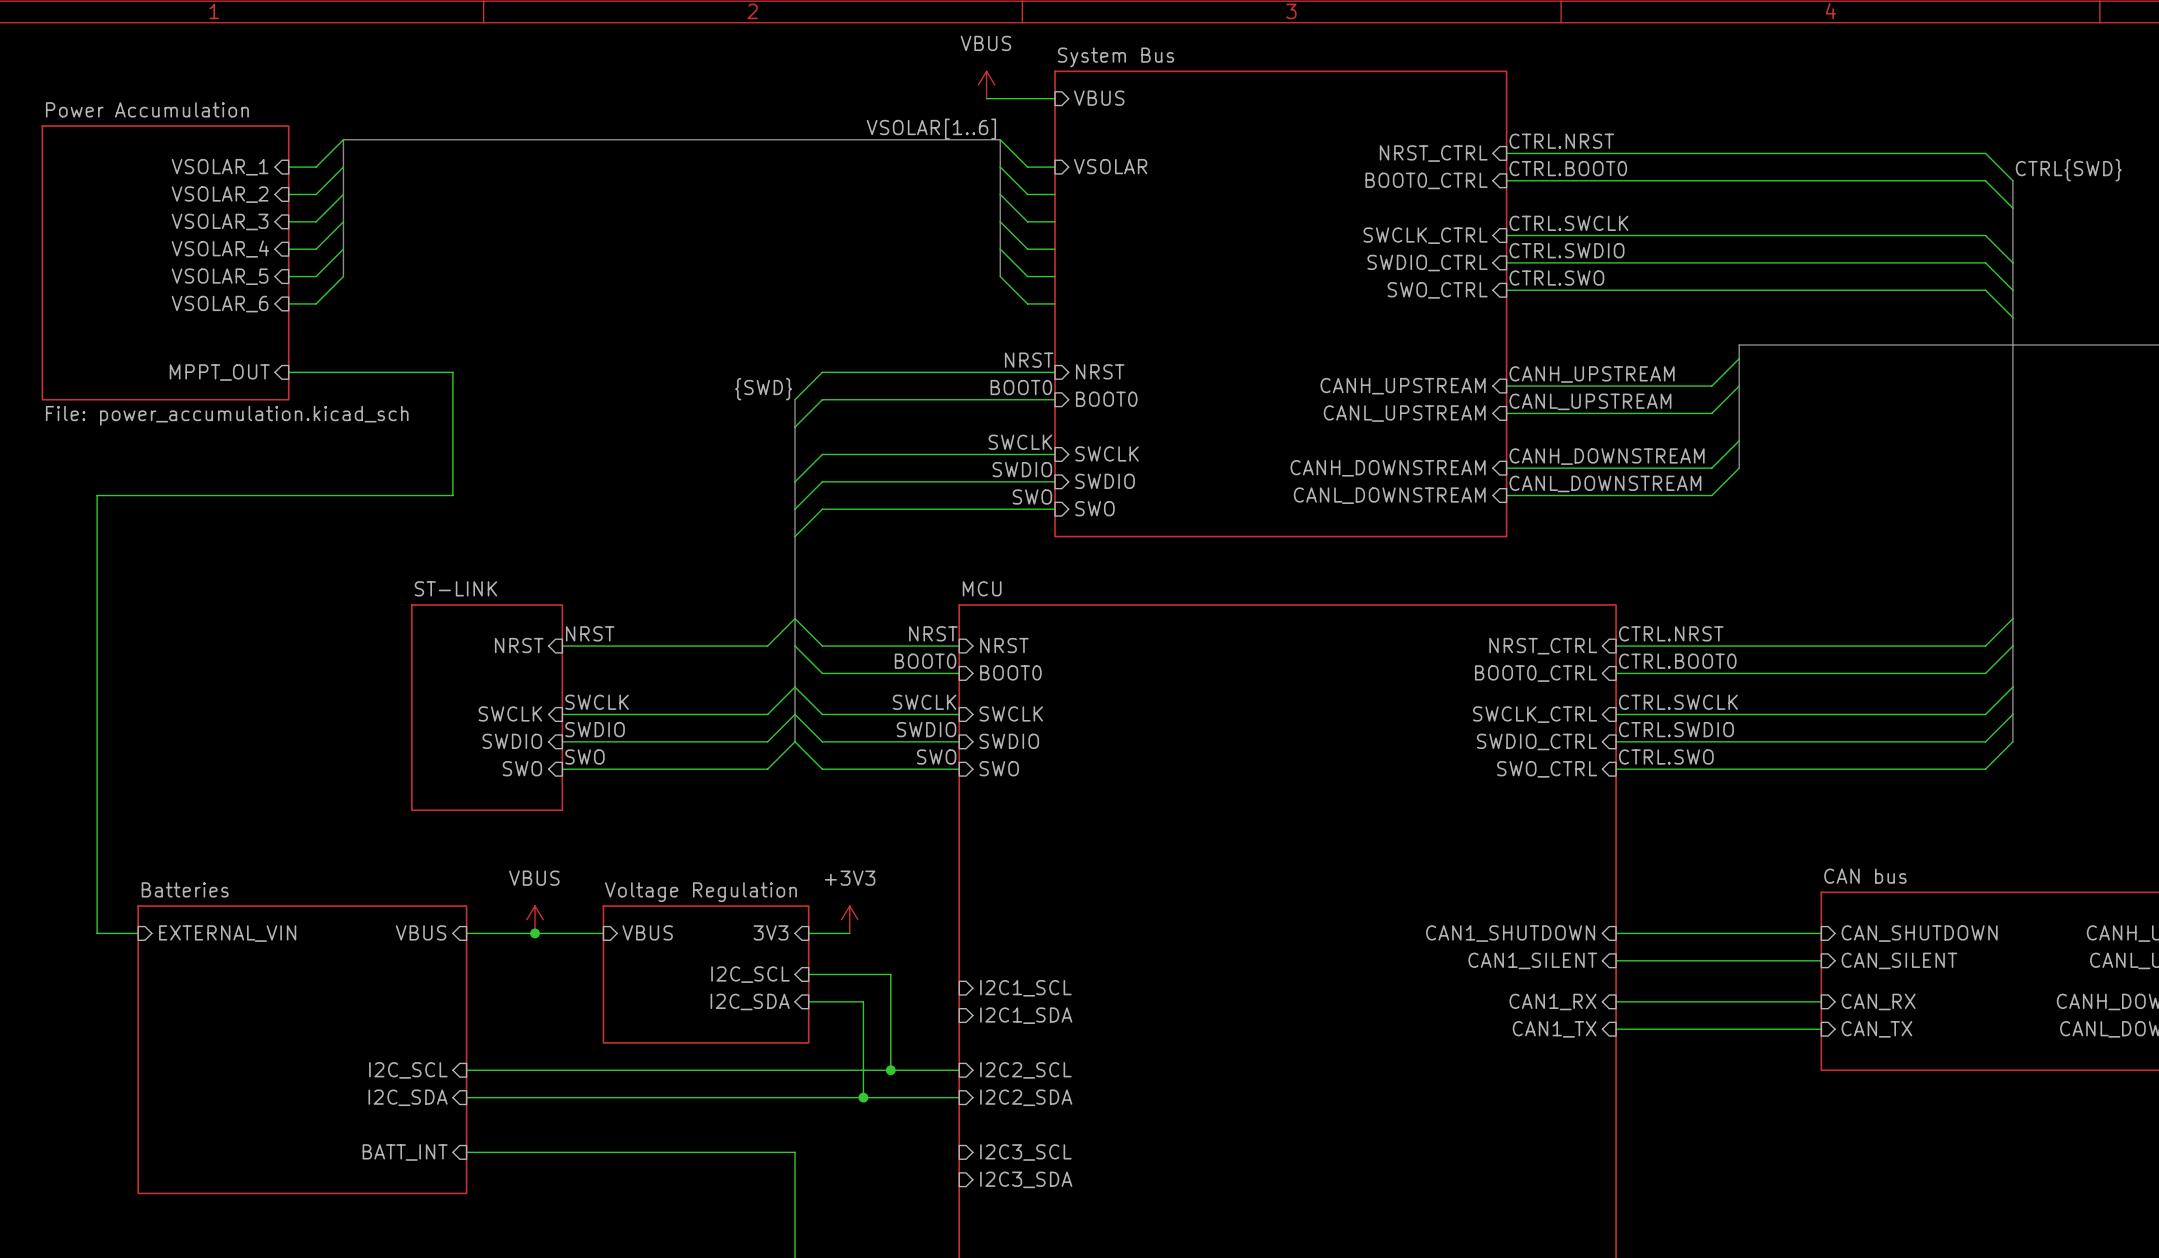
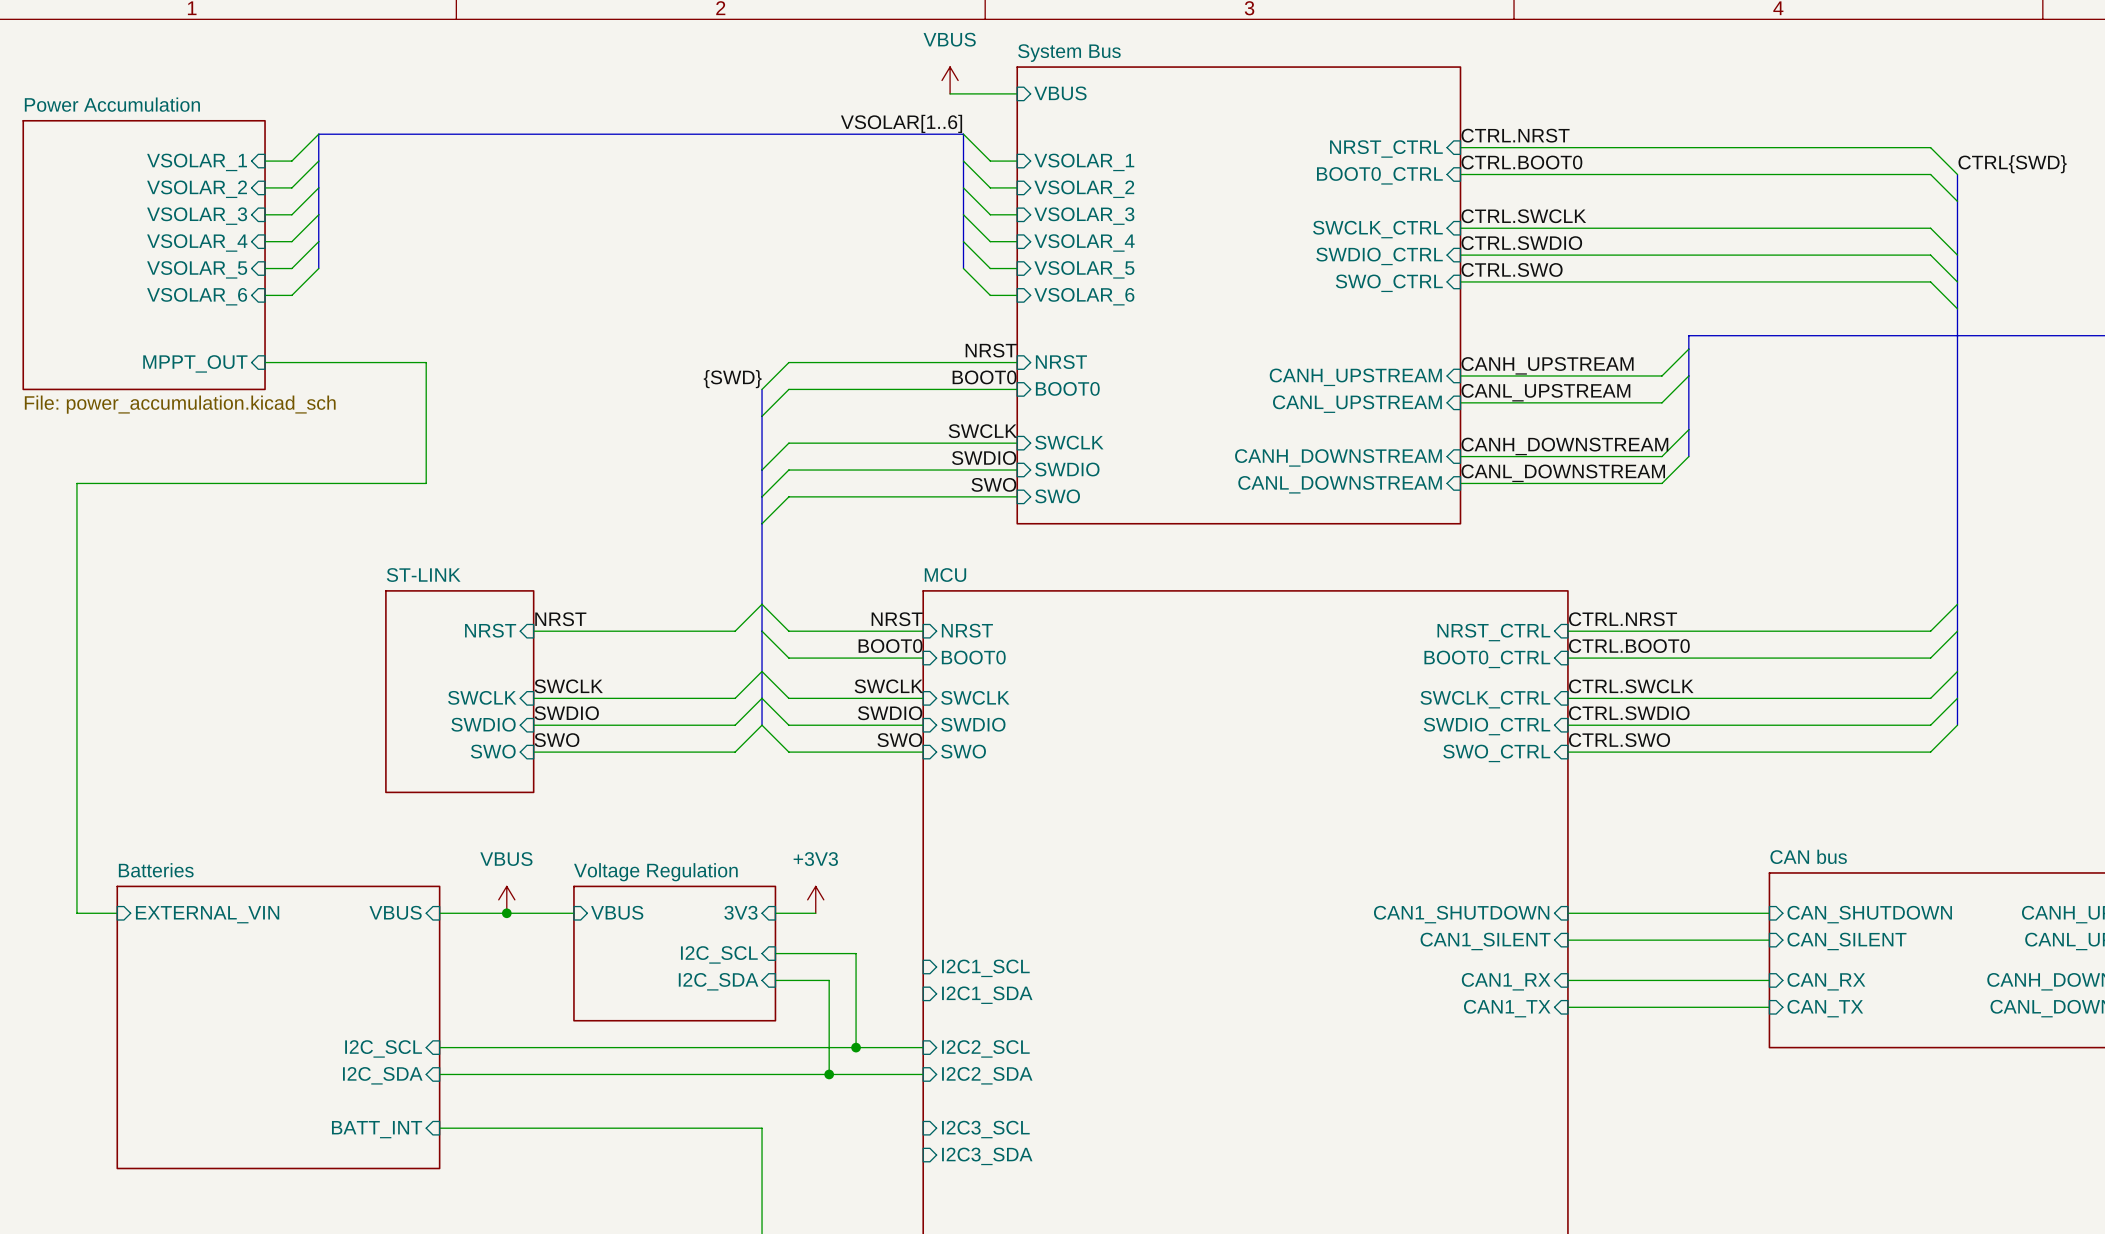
sheet pin: VSOLAR (1110, 166) -> VSOLAR_1 (1084, 162)
sheet pin: none -> VSOLAR_2 (1084, 189)
sheet pin: none -> VSOLAR_3 (1084, 216)
sheet pin: none -> VSOLAR_4 (1084, 243)
sheet pin: none -> VSOLAR_5 (1084, 269)
sheet pin: none -> VSOLAR_6 (1084, 296)

